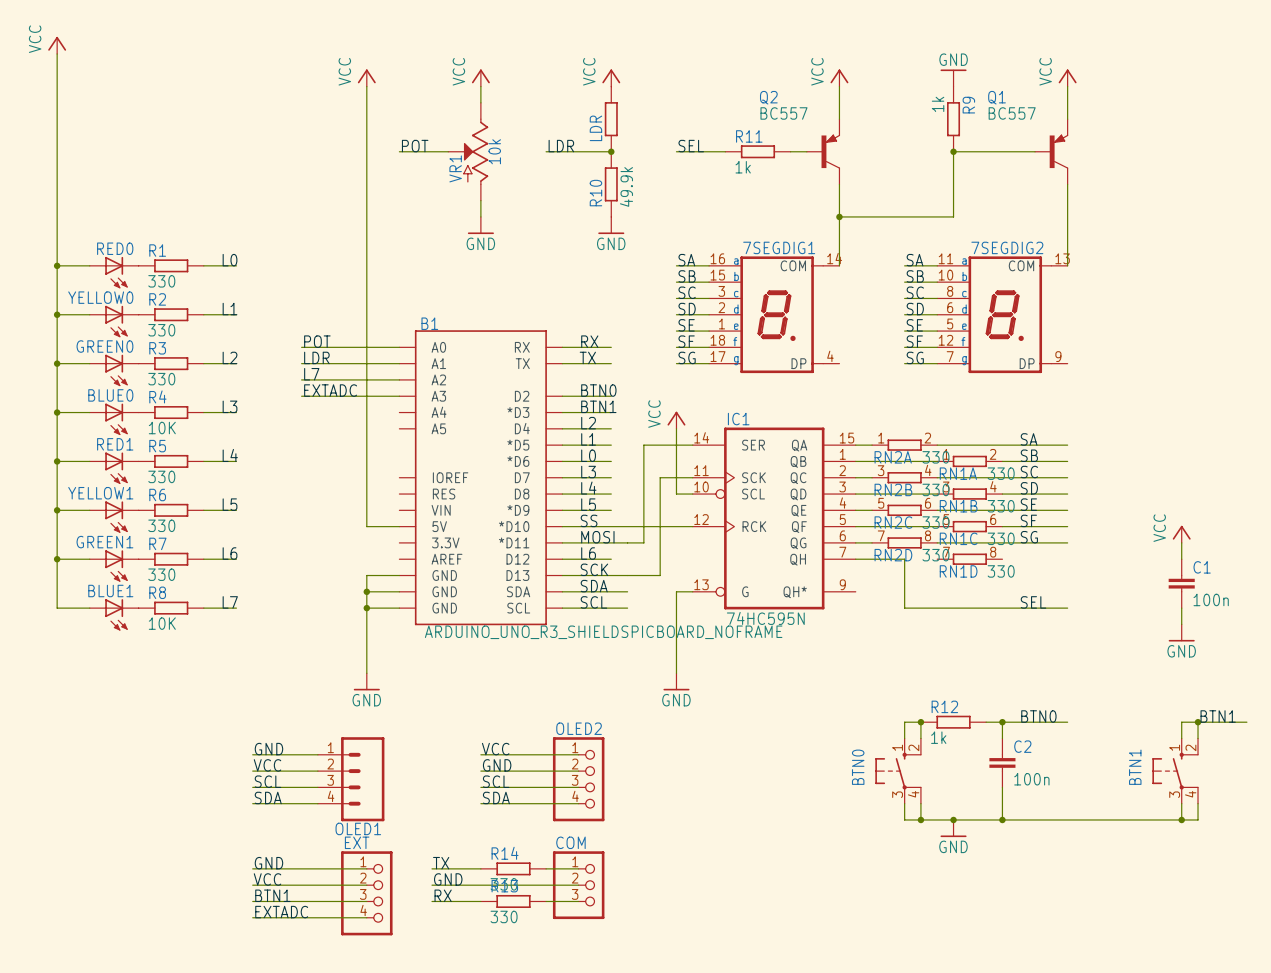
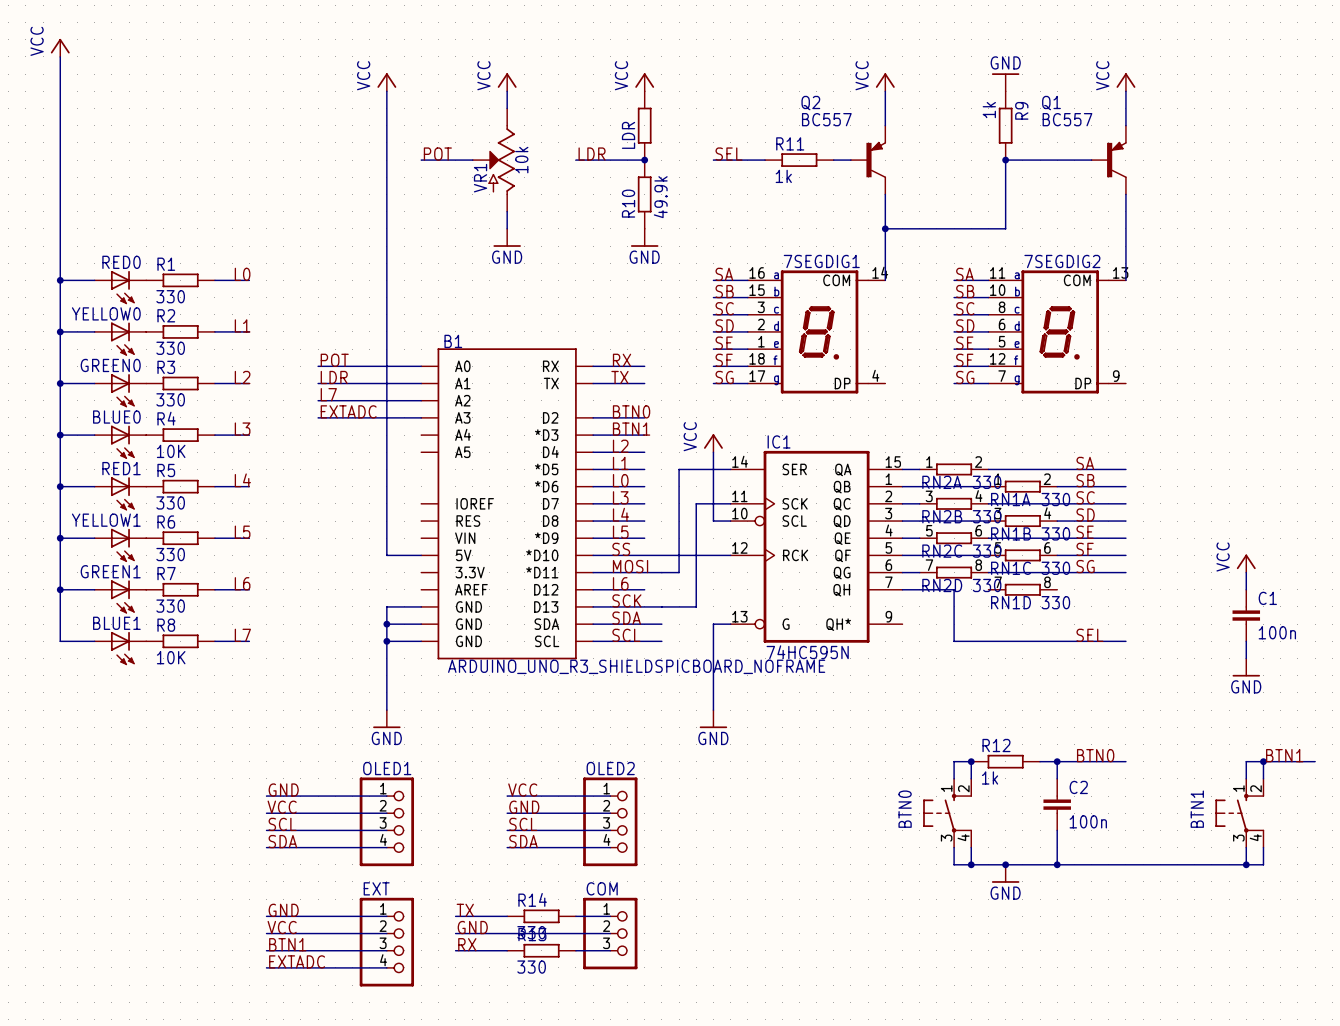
OLED1 symbol: [317, 737, 385, 822] -> [359, 777, 415, 867]
OLED1 name position: OLED1 (358, 828) -> OLED1 (387, 768)

